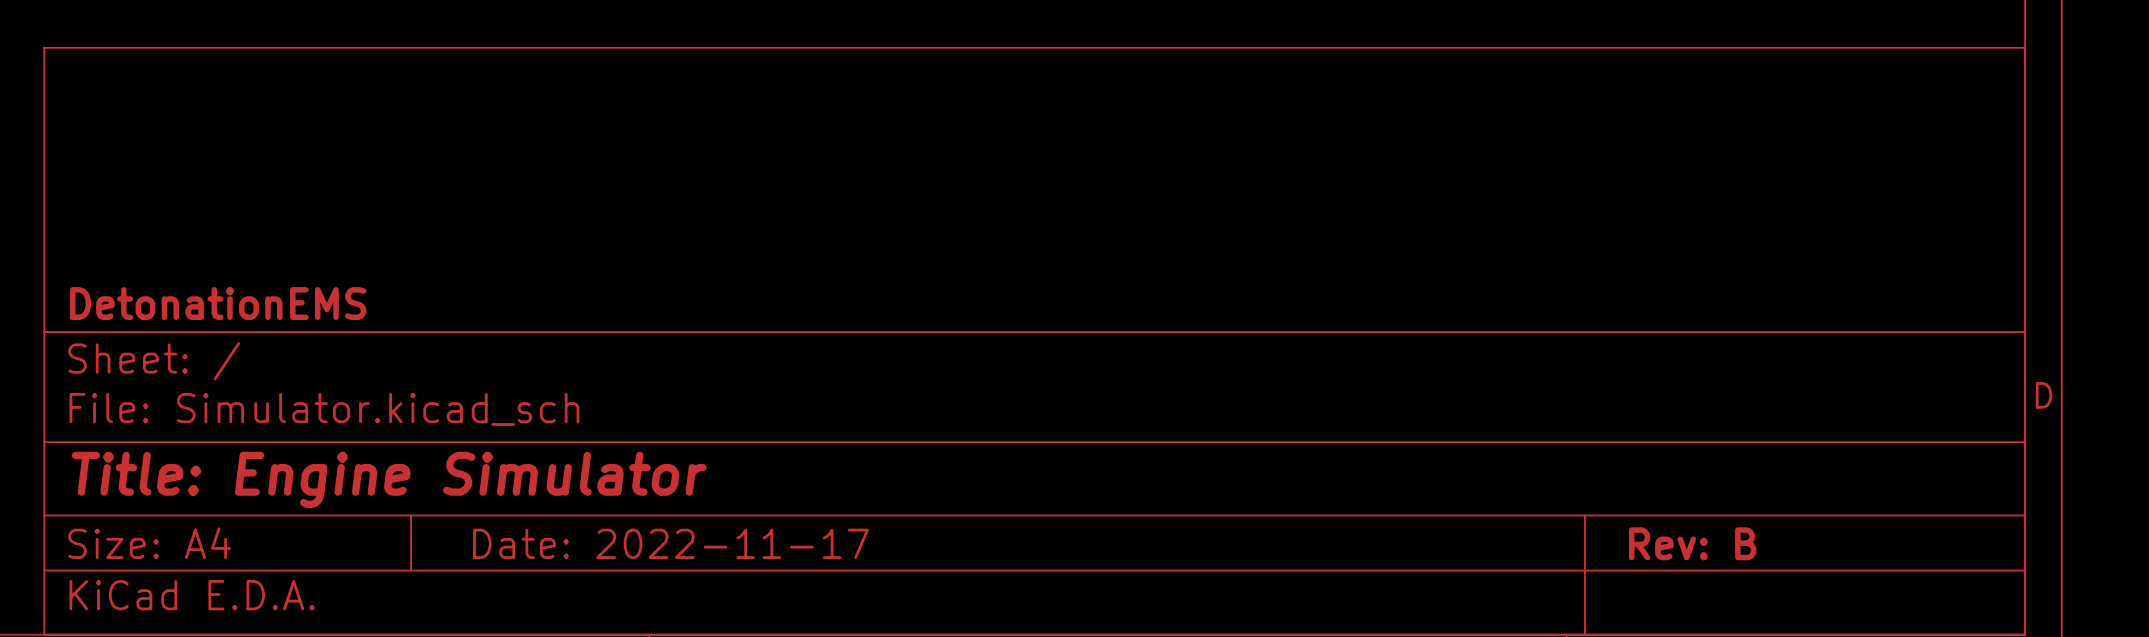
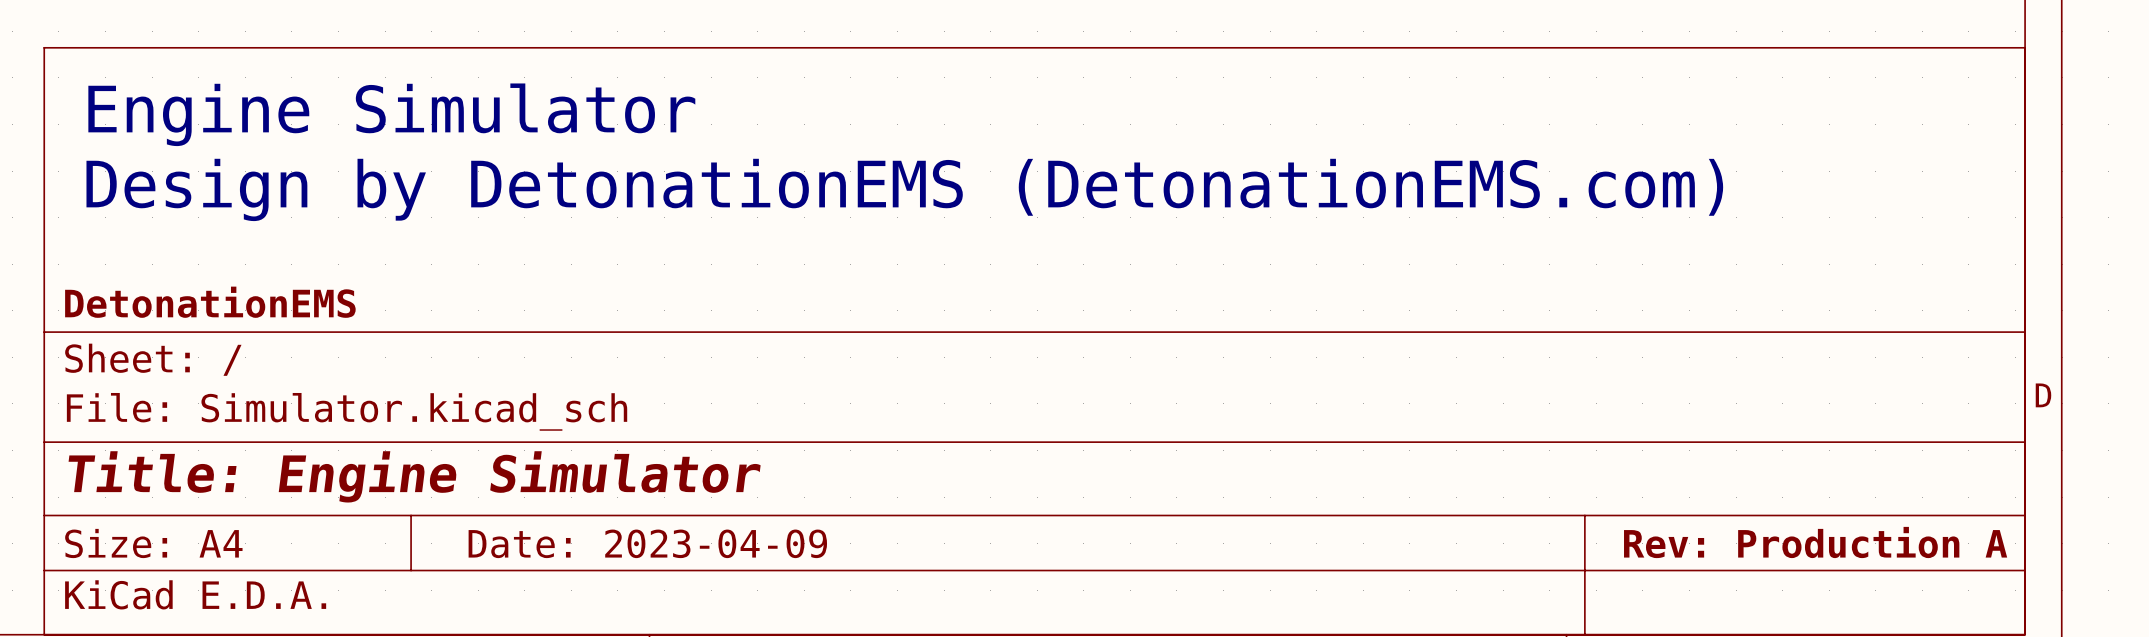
text: none -> Engine Simulator (391, 114)
text: none -> Design by DetonationEMS (DetonationEMS.com) (904, 189)
title block: Date: 2022-11-17 (670, 543) -> Date: 2023-04-09 (647, 543)
title block: Rev: B (1692, 543) -> Rev: Production A (1815, 542)

